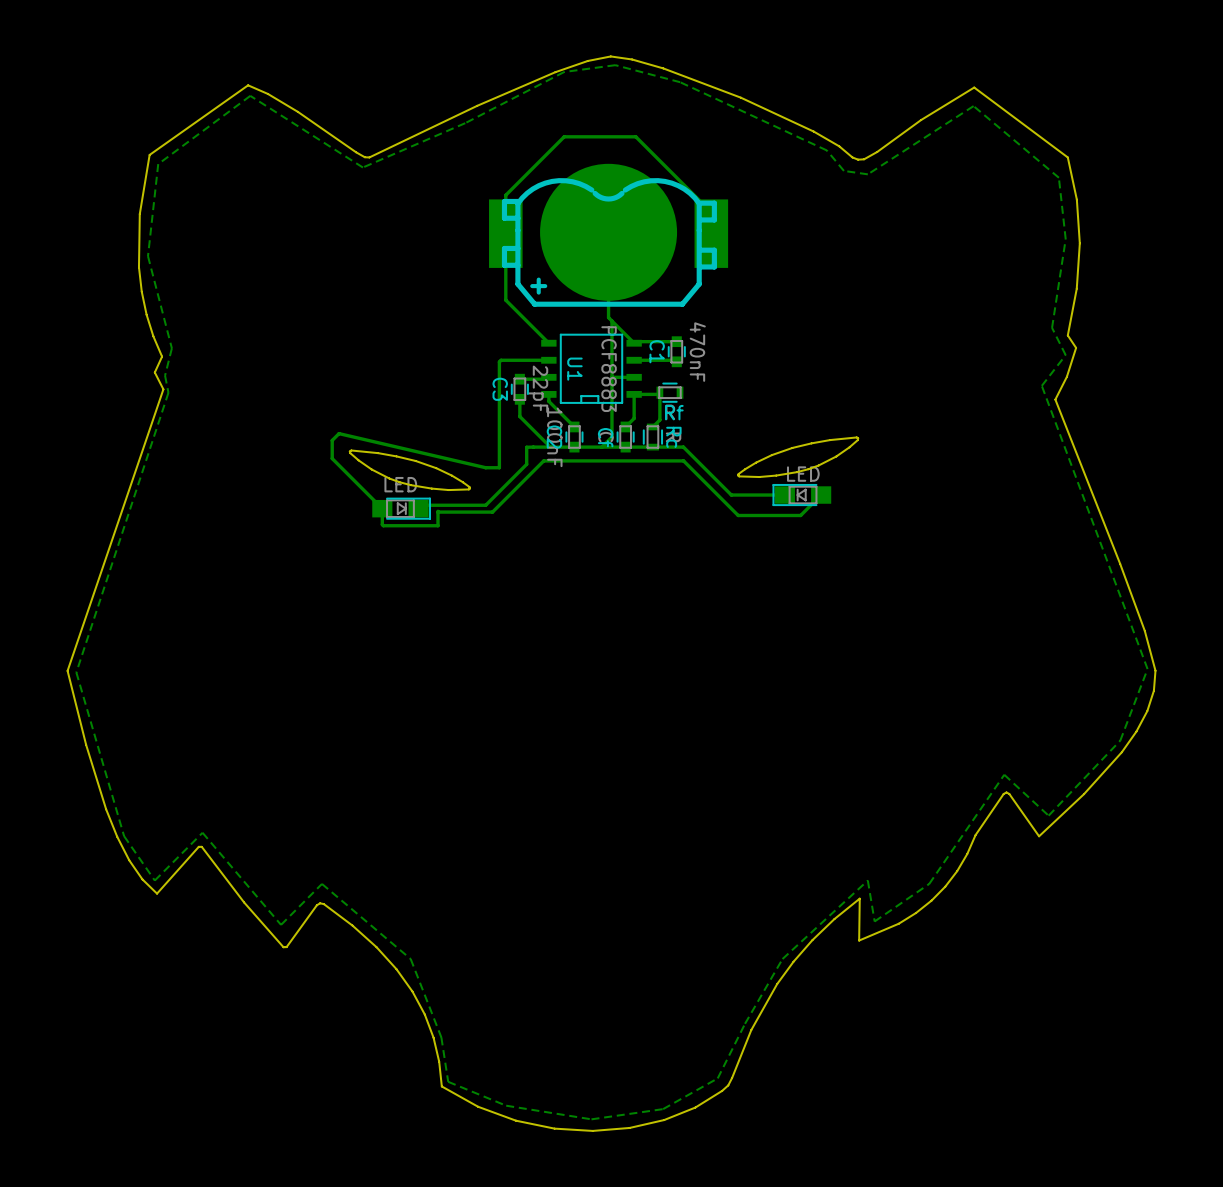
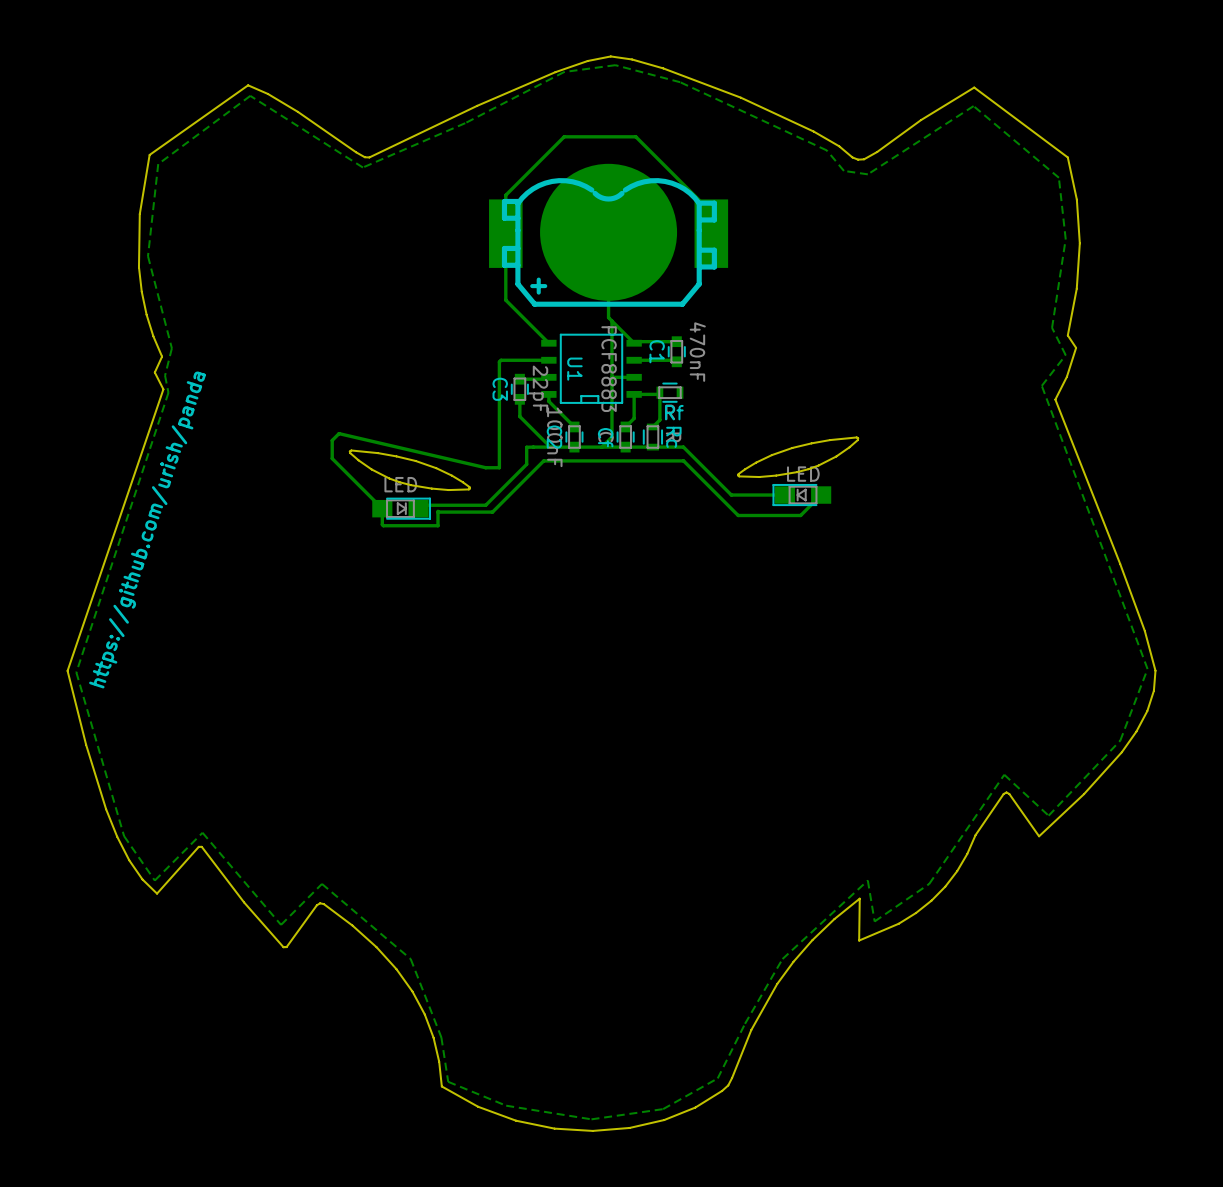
text: none -> https://github.com/urish/panda (147, 529)

